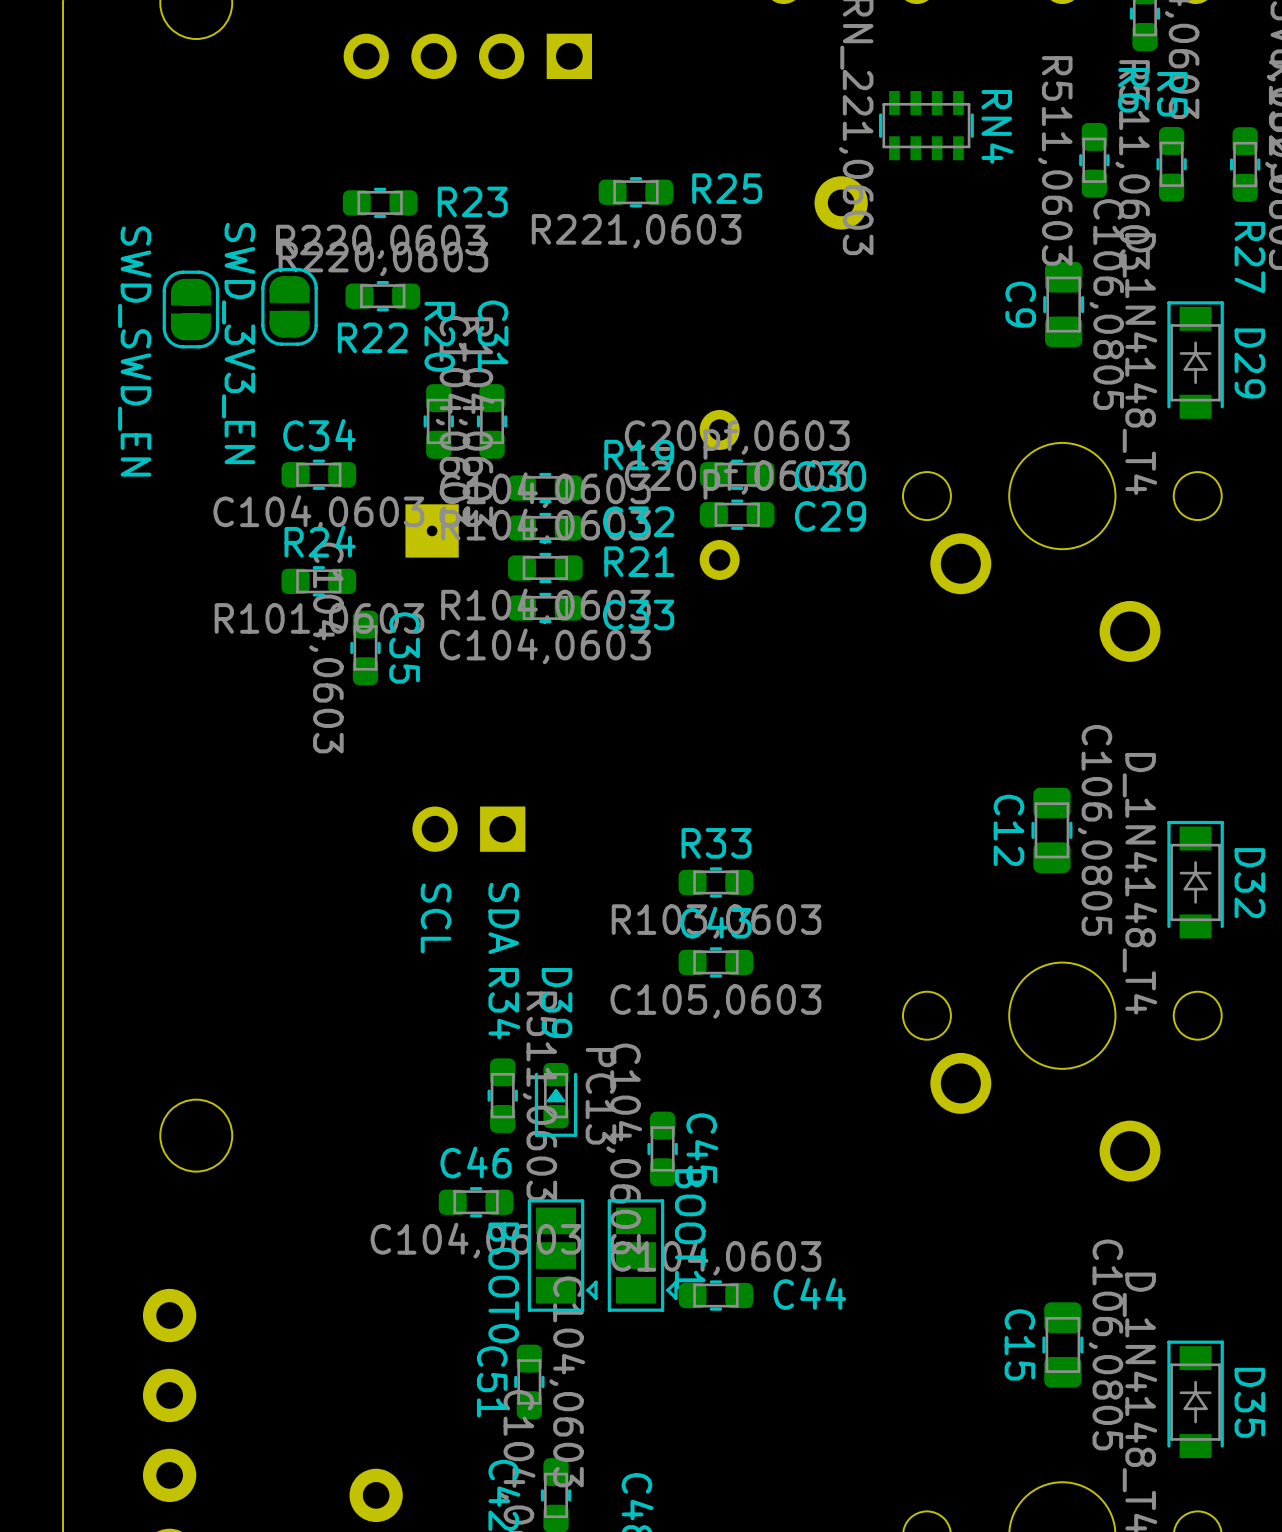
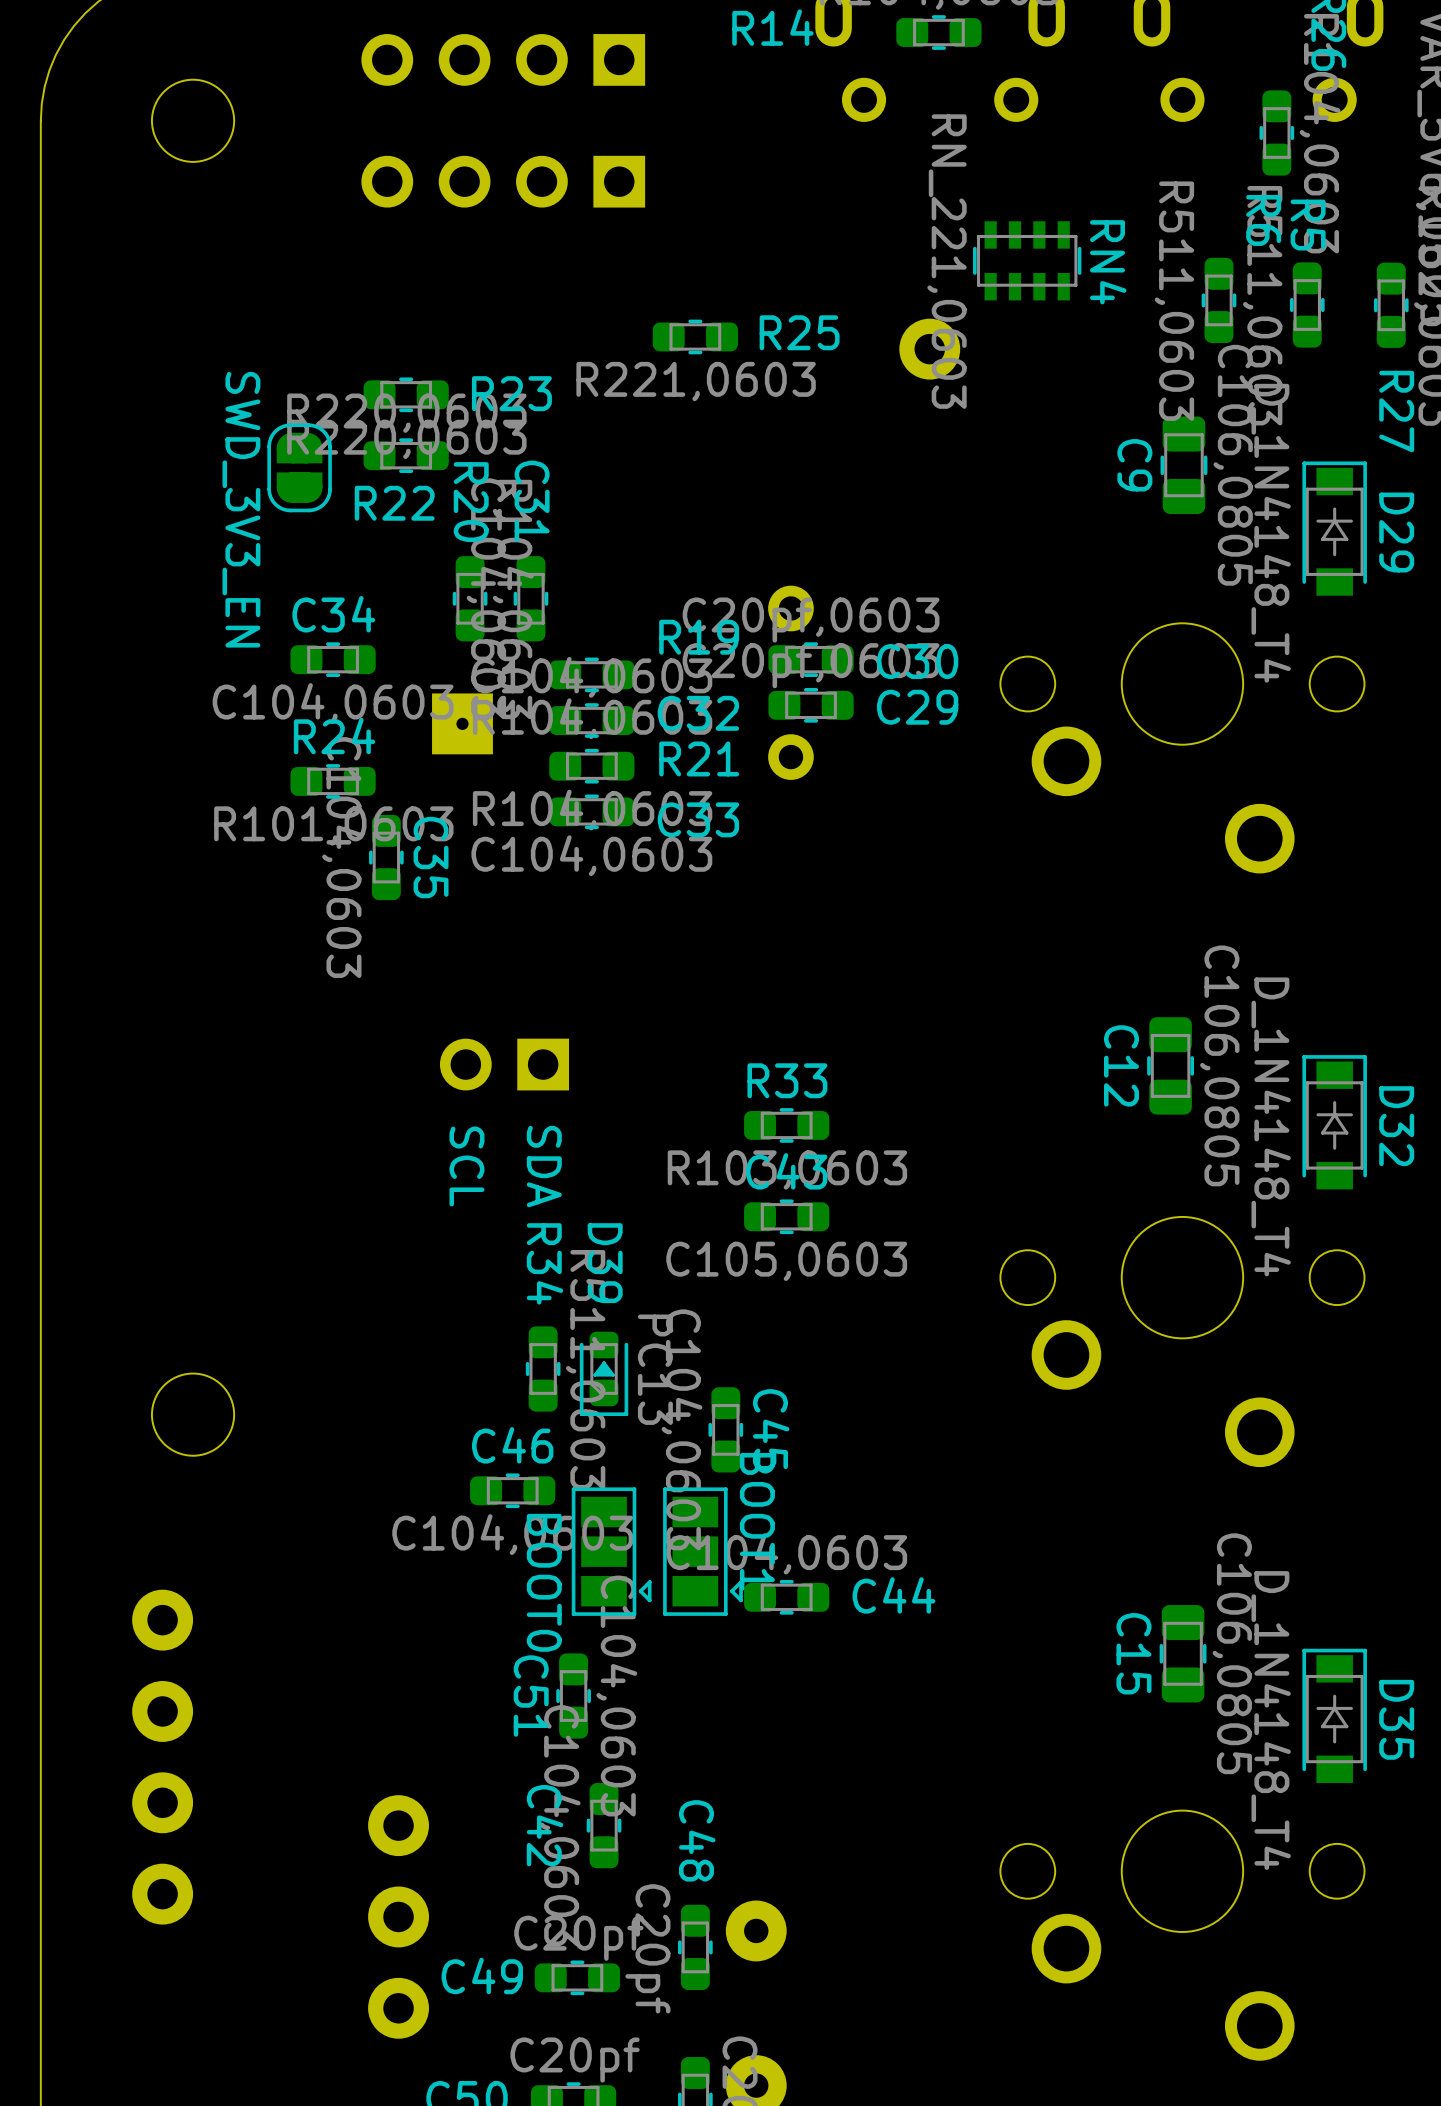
R23 position: (380, 202) -> (406, 394)
part: SWD_SWD_EN (190, 309) -> none

